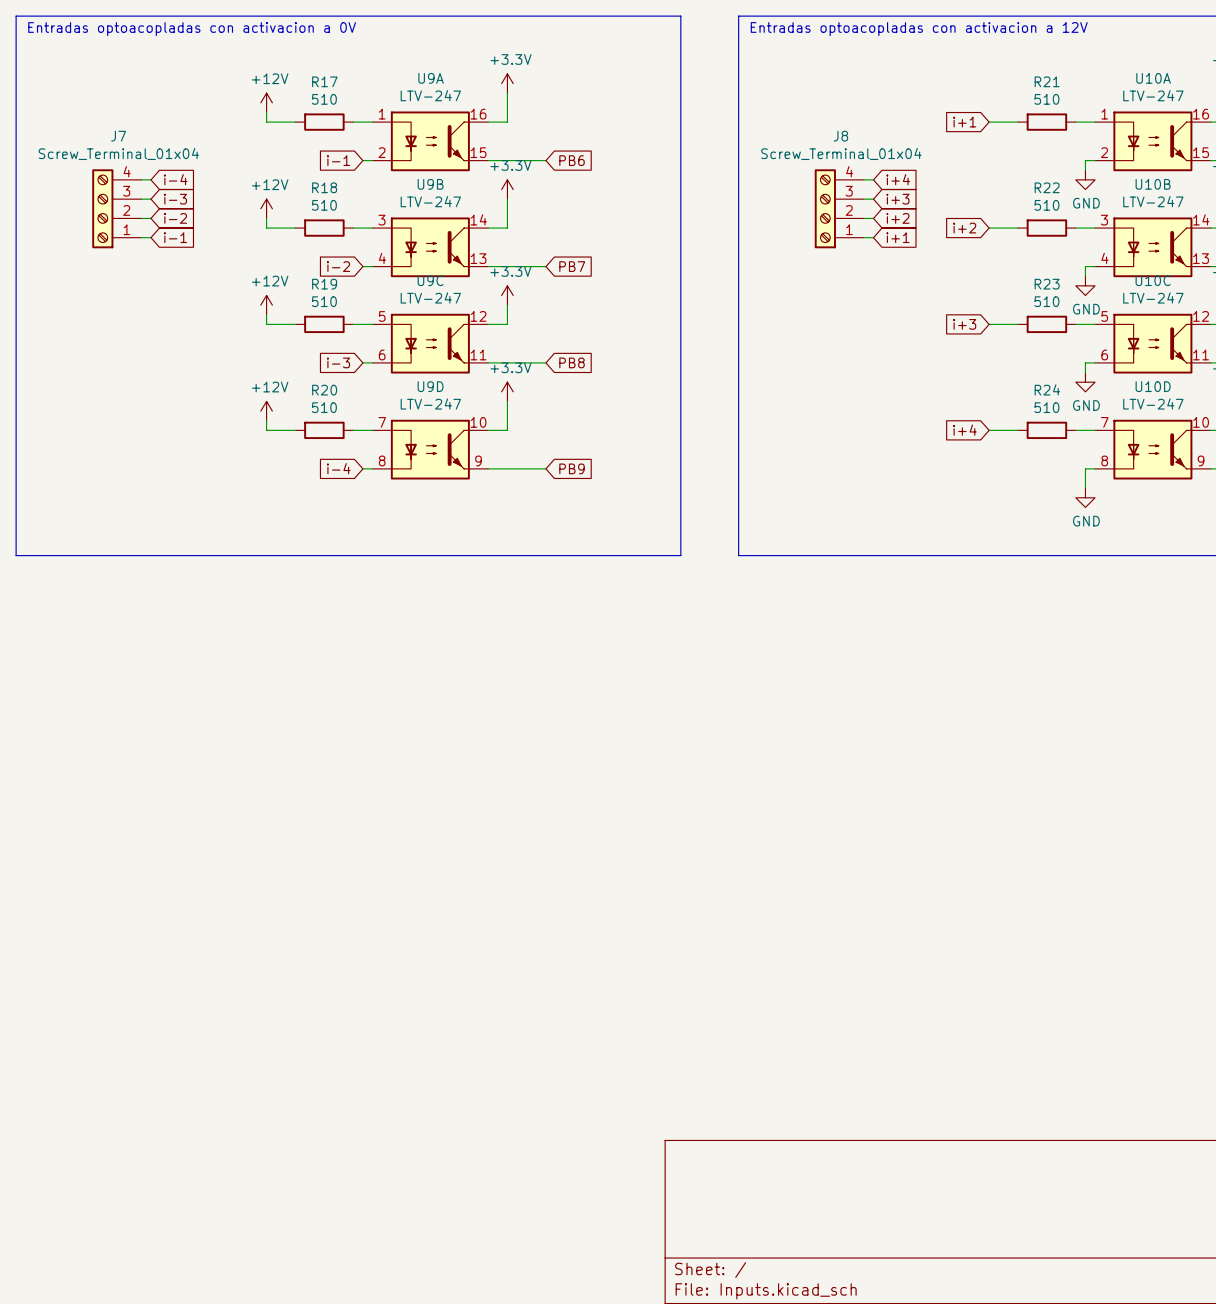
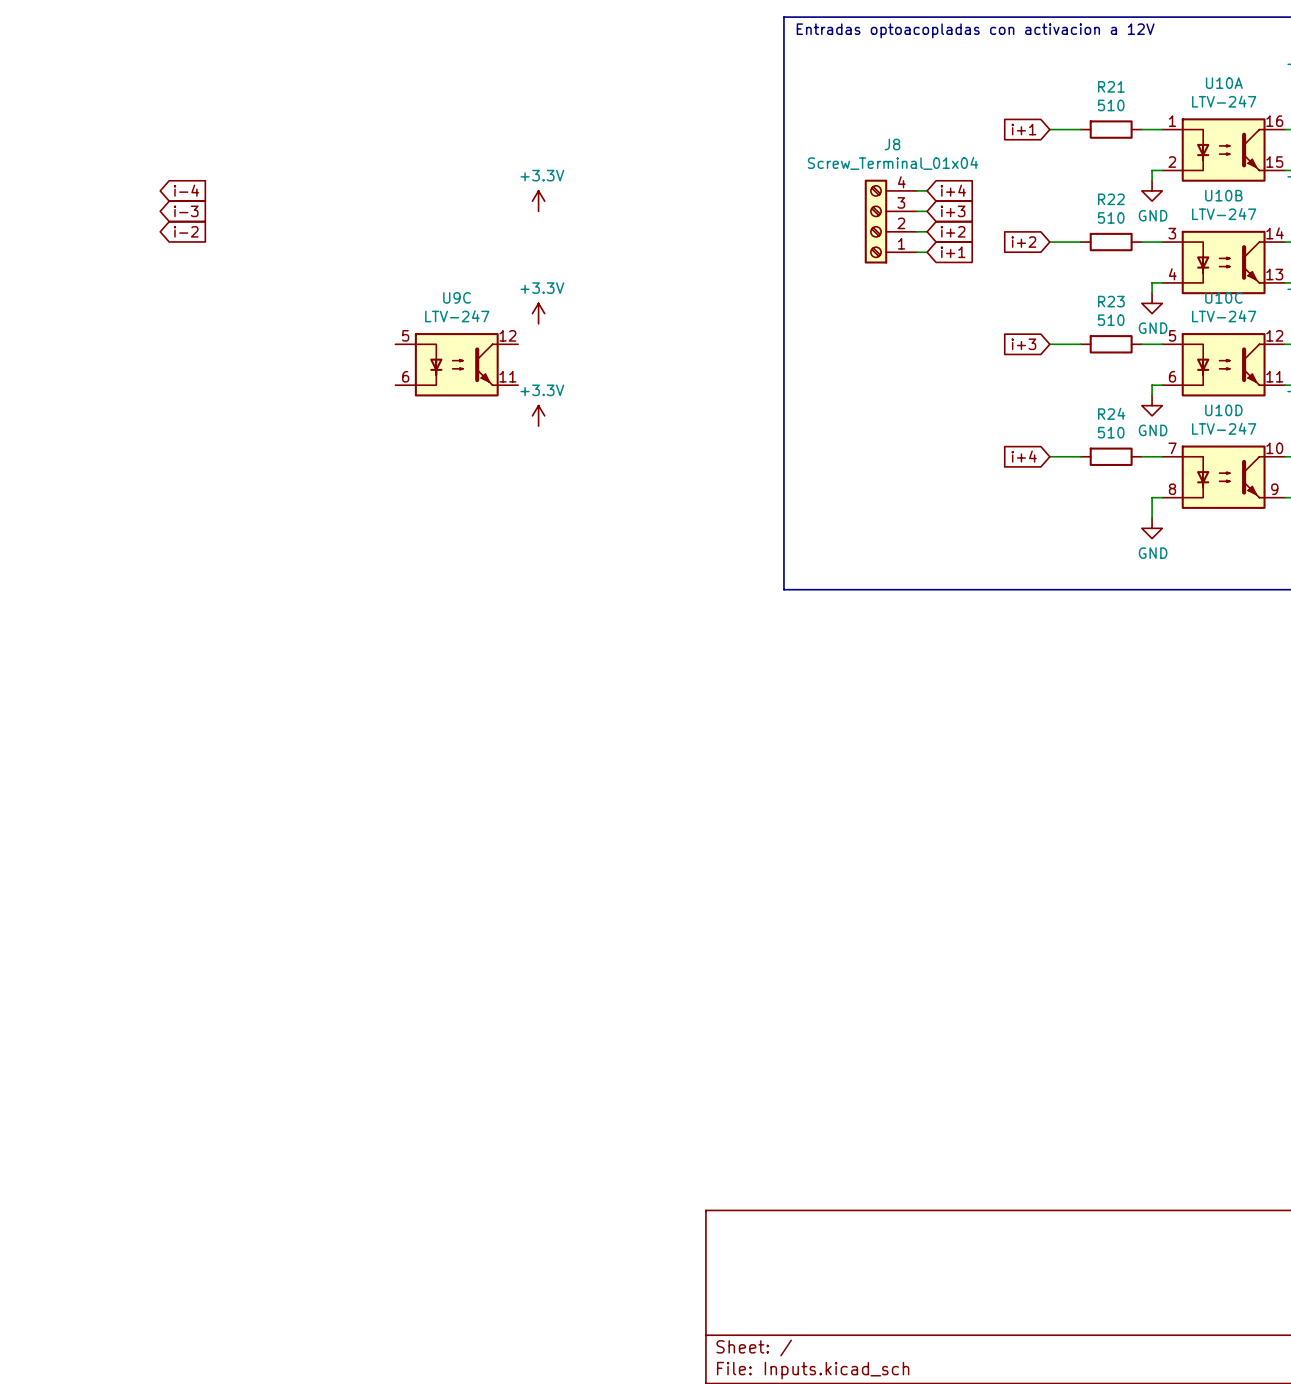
line: (16, 16) (16, 555) (680, 555) (680, 16) (16, 16) -> none
text: Entradas optoacopladas con activacion a 0V (192, 29) -> none
power symbol: +3.3V (507, 83) -> none
wire: (507, 93) (507, 122) (488, 122) -> none
power symbol: +12V (266, 102) -> none
wire: (266, 112) (266, 122) (295, 122) -> none
R17: 510 (324, 122) -> none
wire: (353, 122) (372, 122) -> none
U9A: LTV-247 (430, 141) -> none
global label: i-1 (338, 160) -> none
wire: (362, 160) (372, 160) -> none
wire: (488, 160) (545, 160) -> none
global label: PB6 (572, 160) -> none
wire: (141, 179) (150, 179) -> none
wire: (141, 199) (150, 199) -> none
wire: (507, 199) (507, 228) (488, 228) -> none
J7: Screw_Terminal_01x04 (116, 208) -> none
power symbol: +12V (266, 208) -> none
wire: (141, 218) (150, 218) -> none
wire: (266, 218) (266, 228) (295, 228) -> none
R18: 510 (324, 228) -> none
wire: (353, 228) (372, 228) -> none
wire: (141, 237) (150, 237) -> none
global label: i-1 (175, 237) -> none
U9B: LTV-247 (430, 247) -> none
global label: i-2 (338, 266) -> none
wire: (362, 266) (372, 266) -> none
wire: (488, 266) (545, 266) -> none
global label: PB7 (572, 266) -> none
power symbol: +12V (266, 305) -> none
wire: (507, 305) (507, 324) (488, 324) -> none
wire: (266, 314) (266, 324) (295, 324) -> none
R19: 510 (324, 324) -> none
wire: (353, 324) (372, 324) -> none
global label: i-3 (338, 362) -> none
wire: (362, 362) (372, 362) -> none
wire: (488, 362) (545, 362) -> none
global label: PB8 (572, 362) -> none
wire: (507, 401) (507, 430) (488, 430) -> none
power symbol: +12V (266, 411) -> none
wire: (266, 420) (266, 430) (295, 430) -> none
R20: 510 (324, 430) -> none
wire: (353, 430) (372, 430) -> none
U9D: LTV-247 (430, 449) -> none
global label: i-4 (338, 468) -> none
wire: (362, 468) (372, 468) -> none
wire: (488, 468) (545, 468) -> none
global label: PB9 (572, 468) -> none

